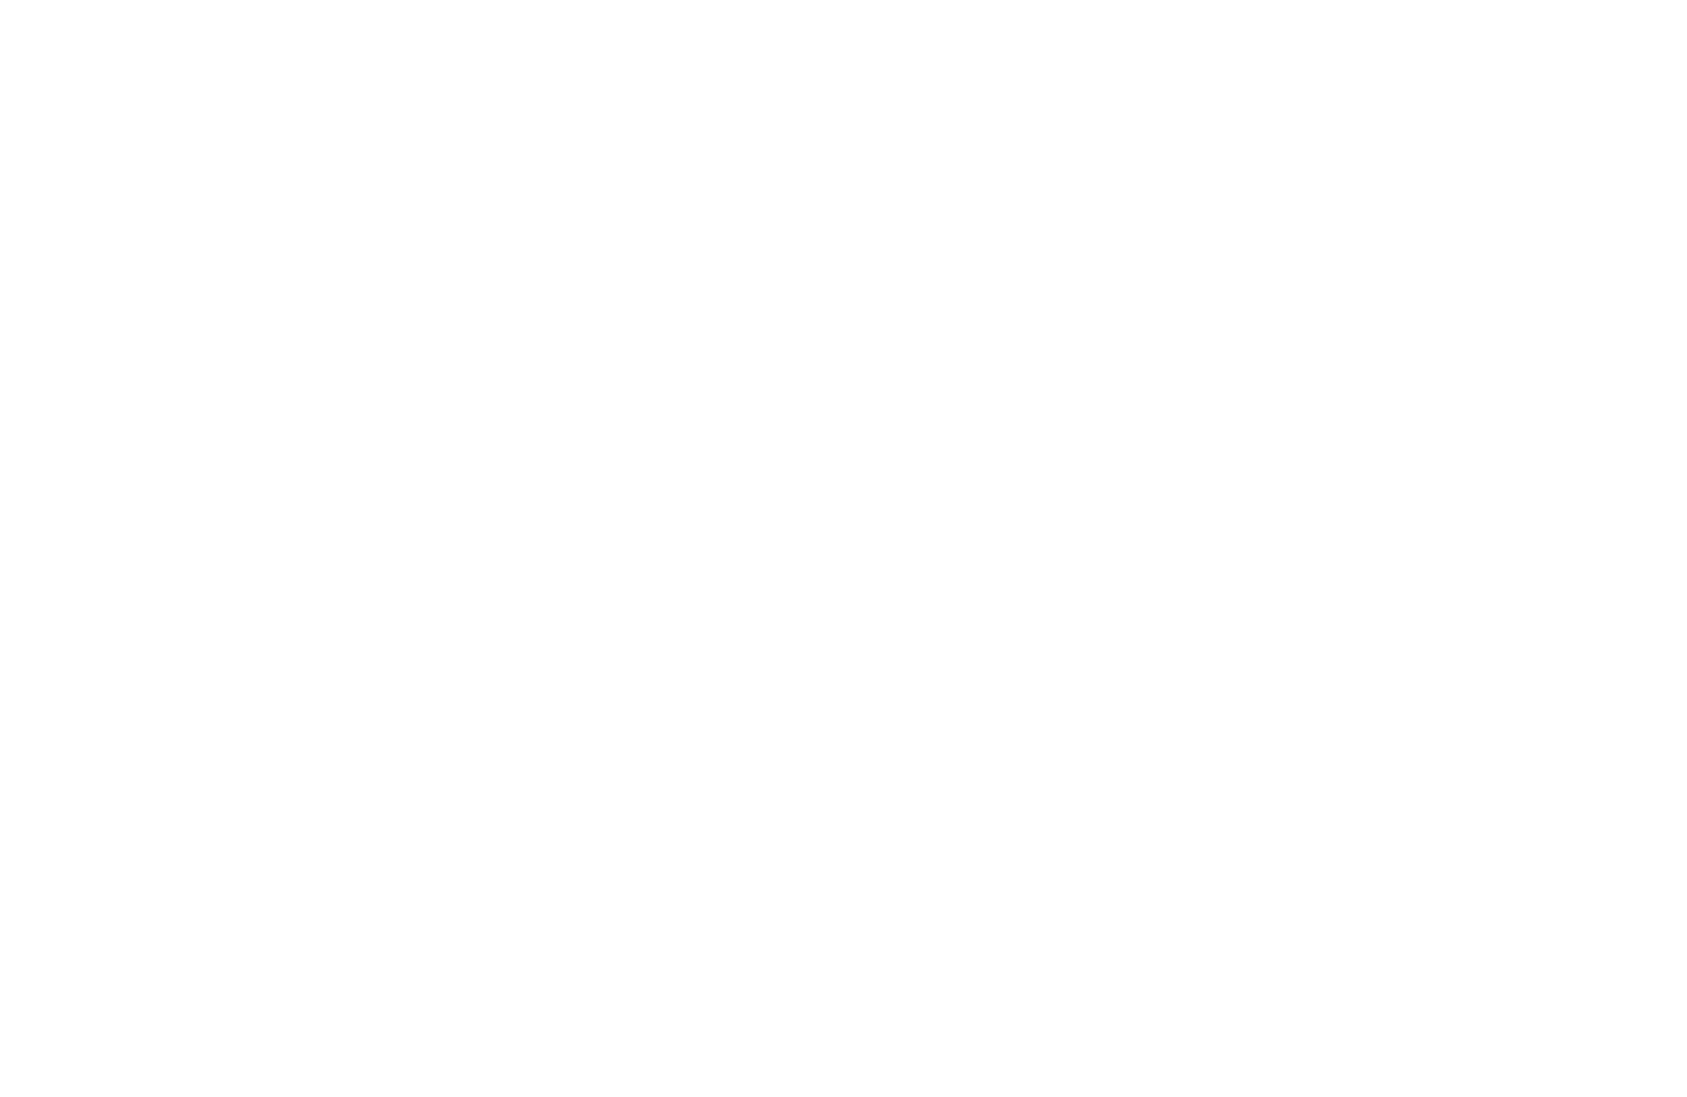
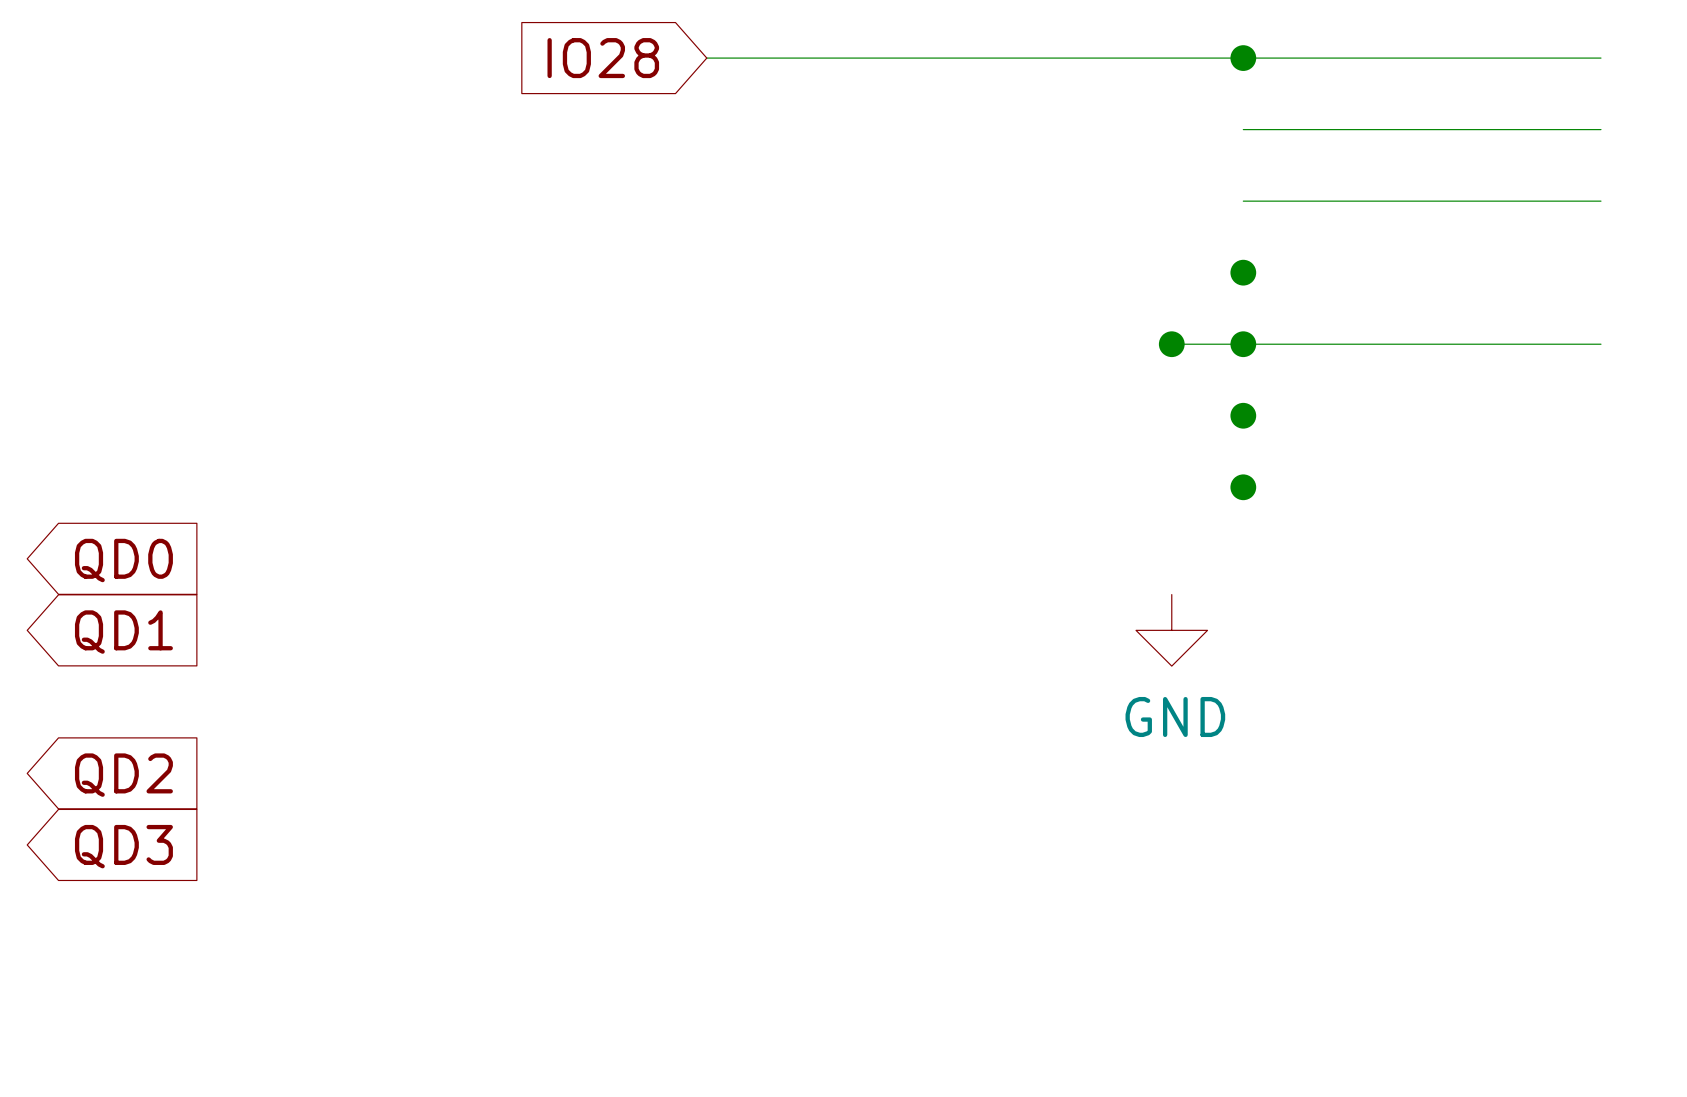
global label: none -> IO28 (603, 58)
wire: none -> (706, 58) (1600, 58)
junction: none -> (1243, 58)
wire: none -> (1243, 129) (1600, 129)
wire: none -> (1243, 201) (1600, 201)
junction: none -> (1243, 272)
wire: none -> (1171, 344) (1600, 344)
junction: none -> (1171, 344)
junction: none -> (1243, 344)
junction: none -> (1243, 415)
junction: none -> (1243, 487)
global label: none -> QD0 (123, 560)
power symbol: none -> GND (1171, 630)
global label: none -> QD1 (123, 632)
global label: none -> QD2 (123, 775)
global label: none -> QD3 (123, 846)

